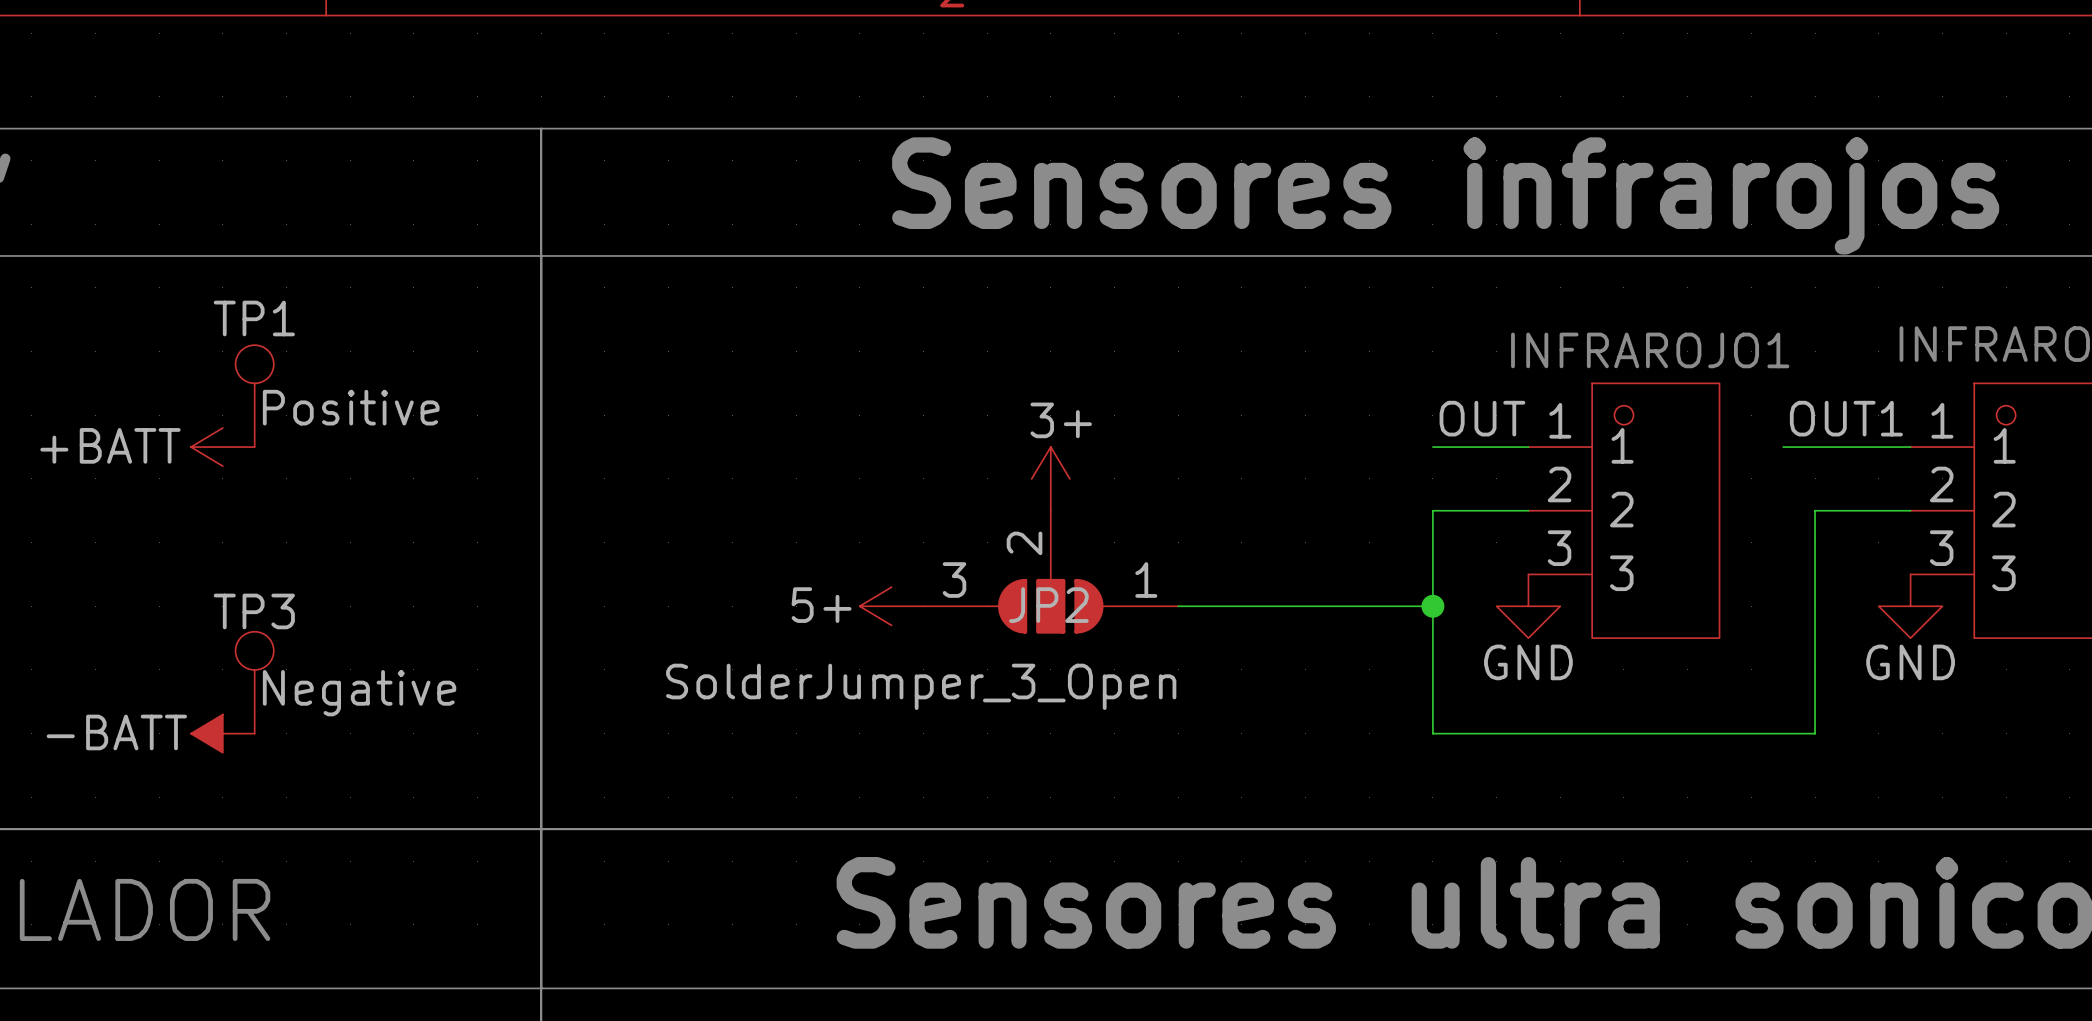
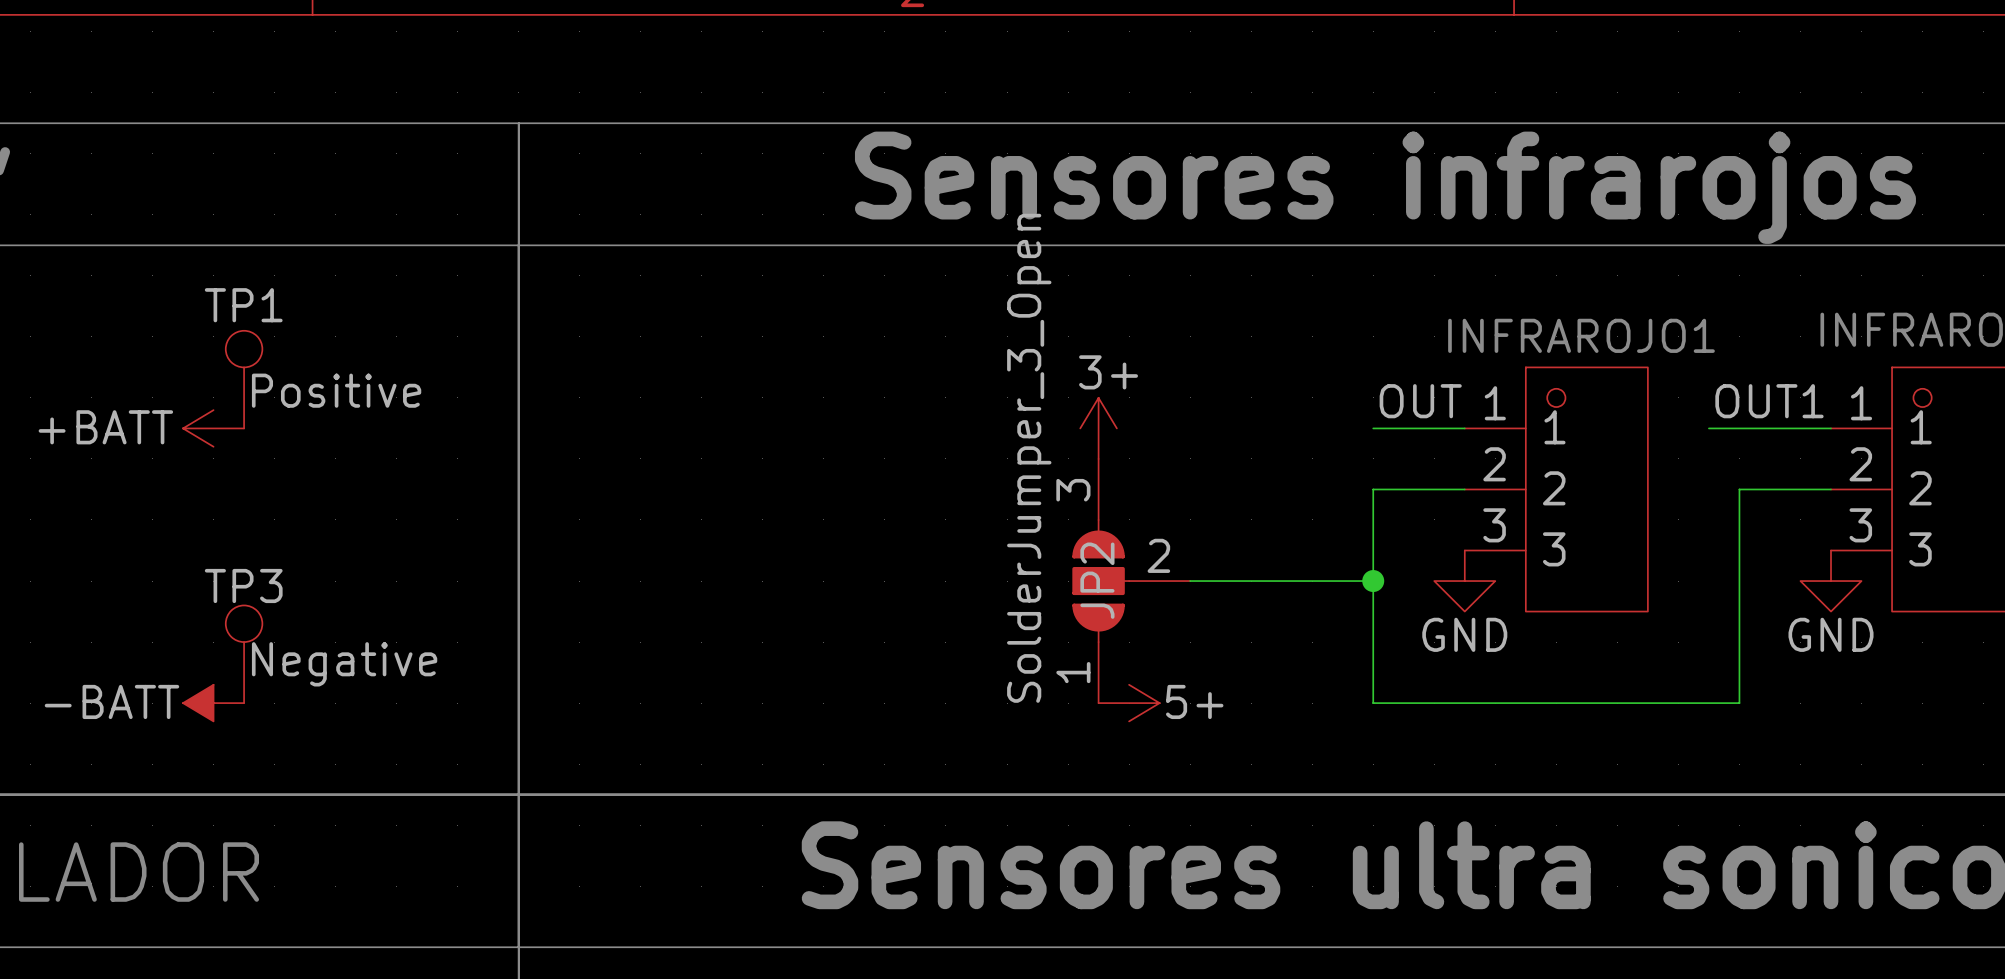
power symbol position: 3+ (1050, 478) -> 3+ (1098, 428)
JP2 rotation: 0° (1050, 604) -> 90° clockwise (1100, 581)
power symbol rotation: 0° (891, 606) -> 180° (1129, 703)
power symbol position: 5+ (891, 606) -> 5+ (1129, 703)

